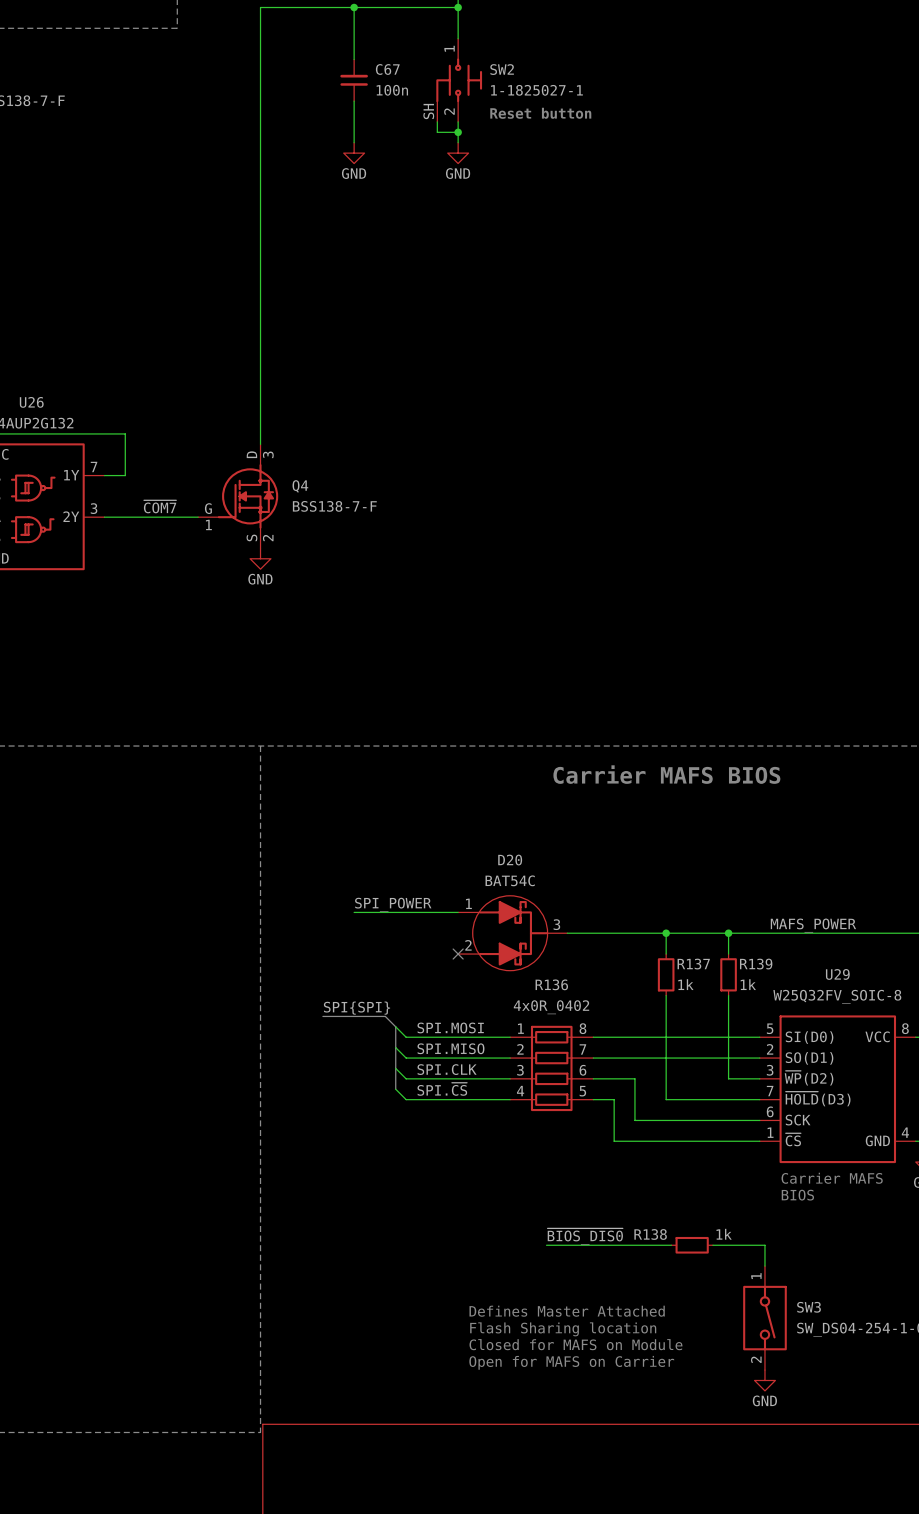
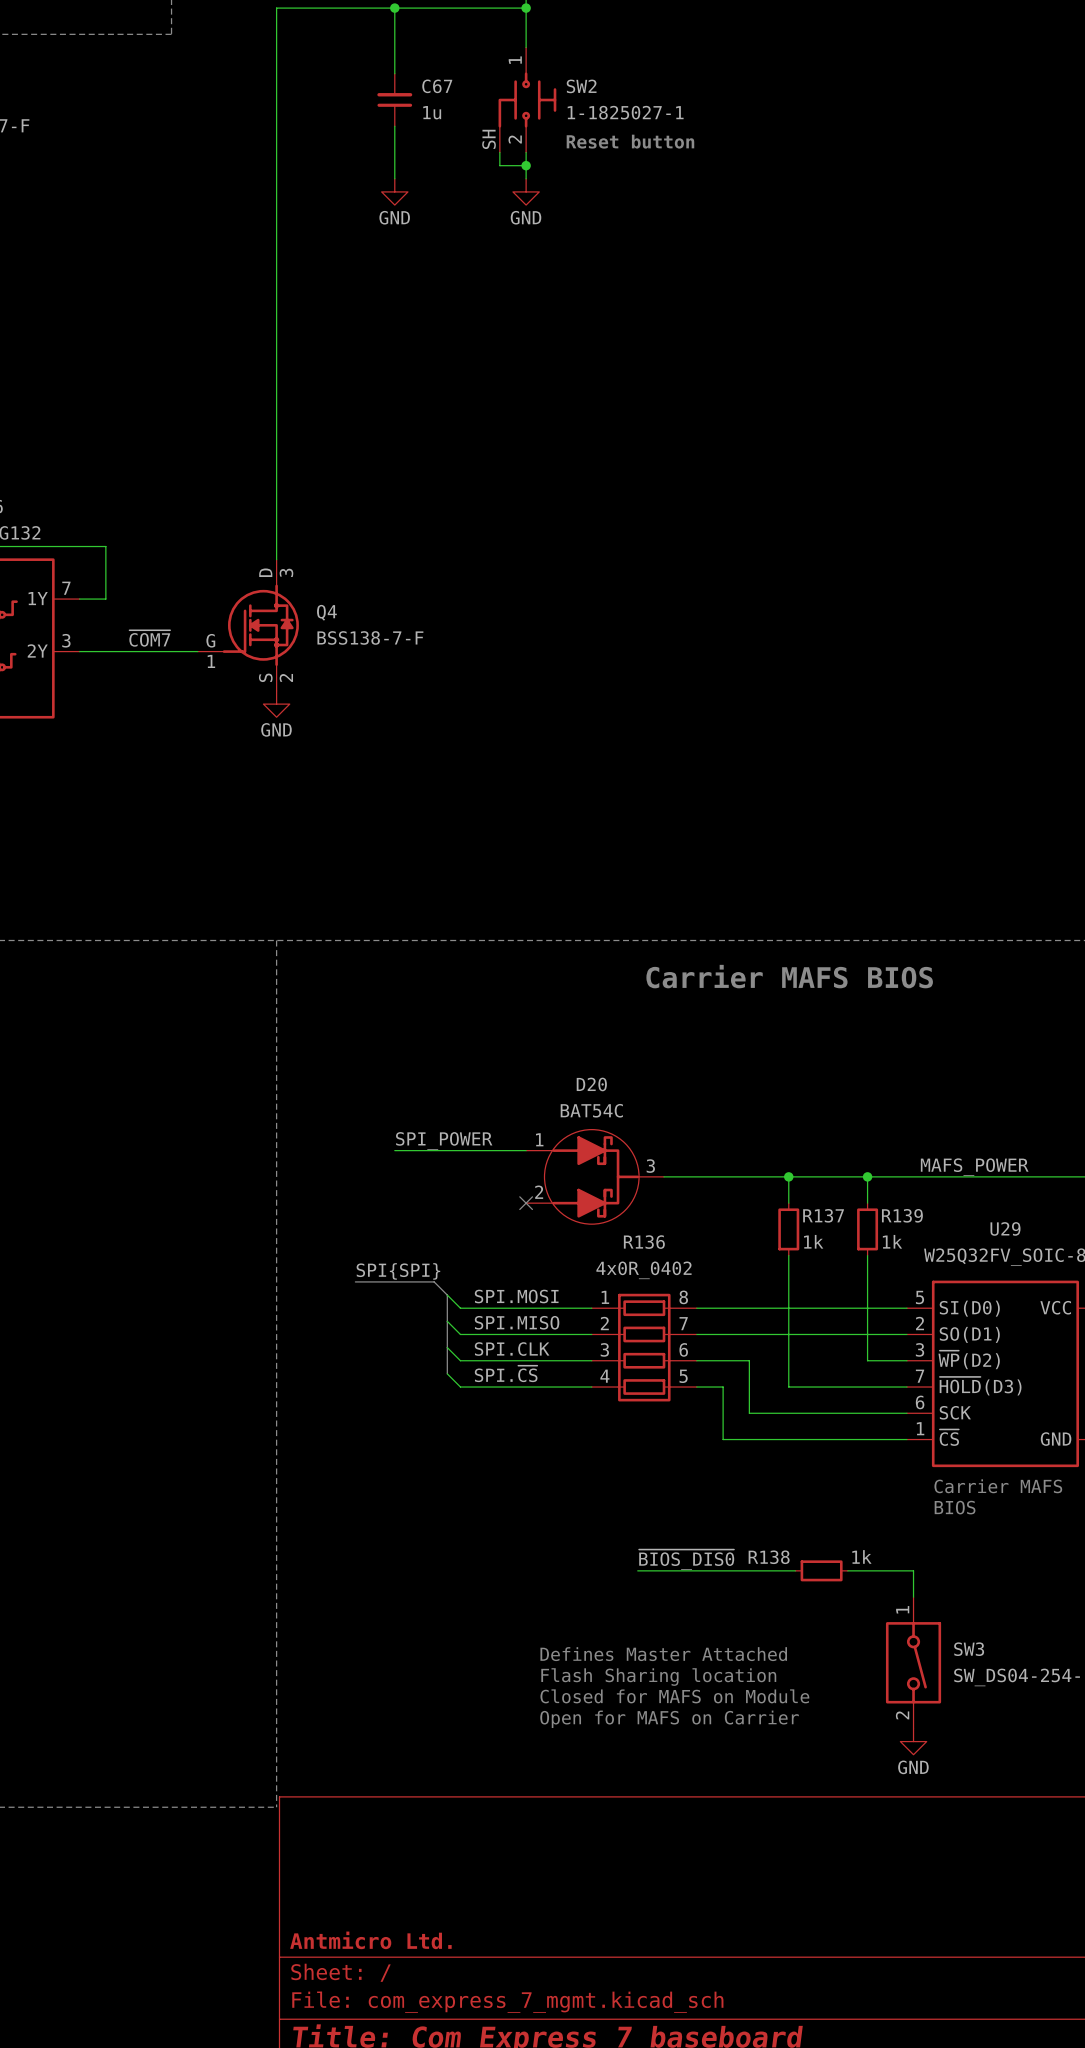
C67 text: 100n (392, 90) -> 1u (432, 112)

